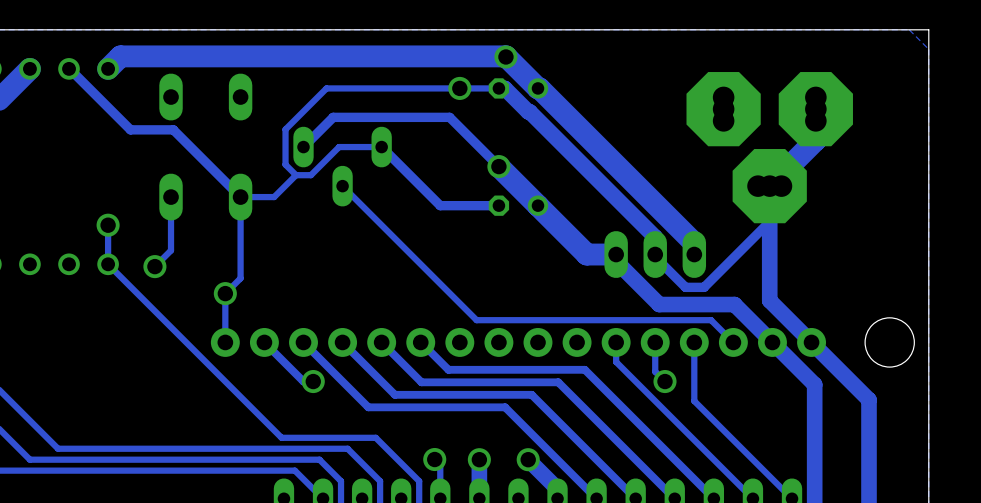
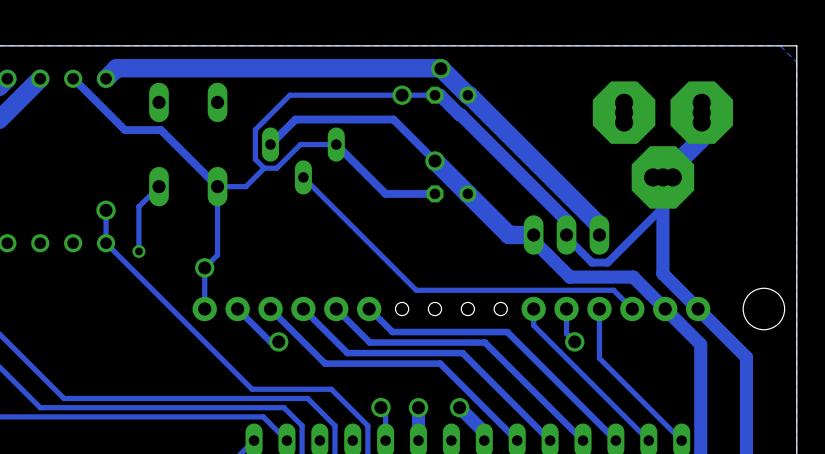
track: (171, 197) (171, 250) (154, 266) -> (159, 186) (138, 206) (138, 251)
via size: [143, 255, 167, 279] -> [132, 244, 146, 258]
part footprint: [210, 327, 827, 357] -> [192, 296, 711, 322]

